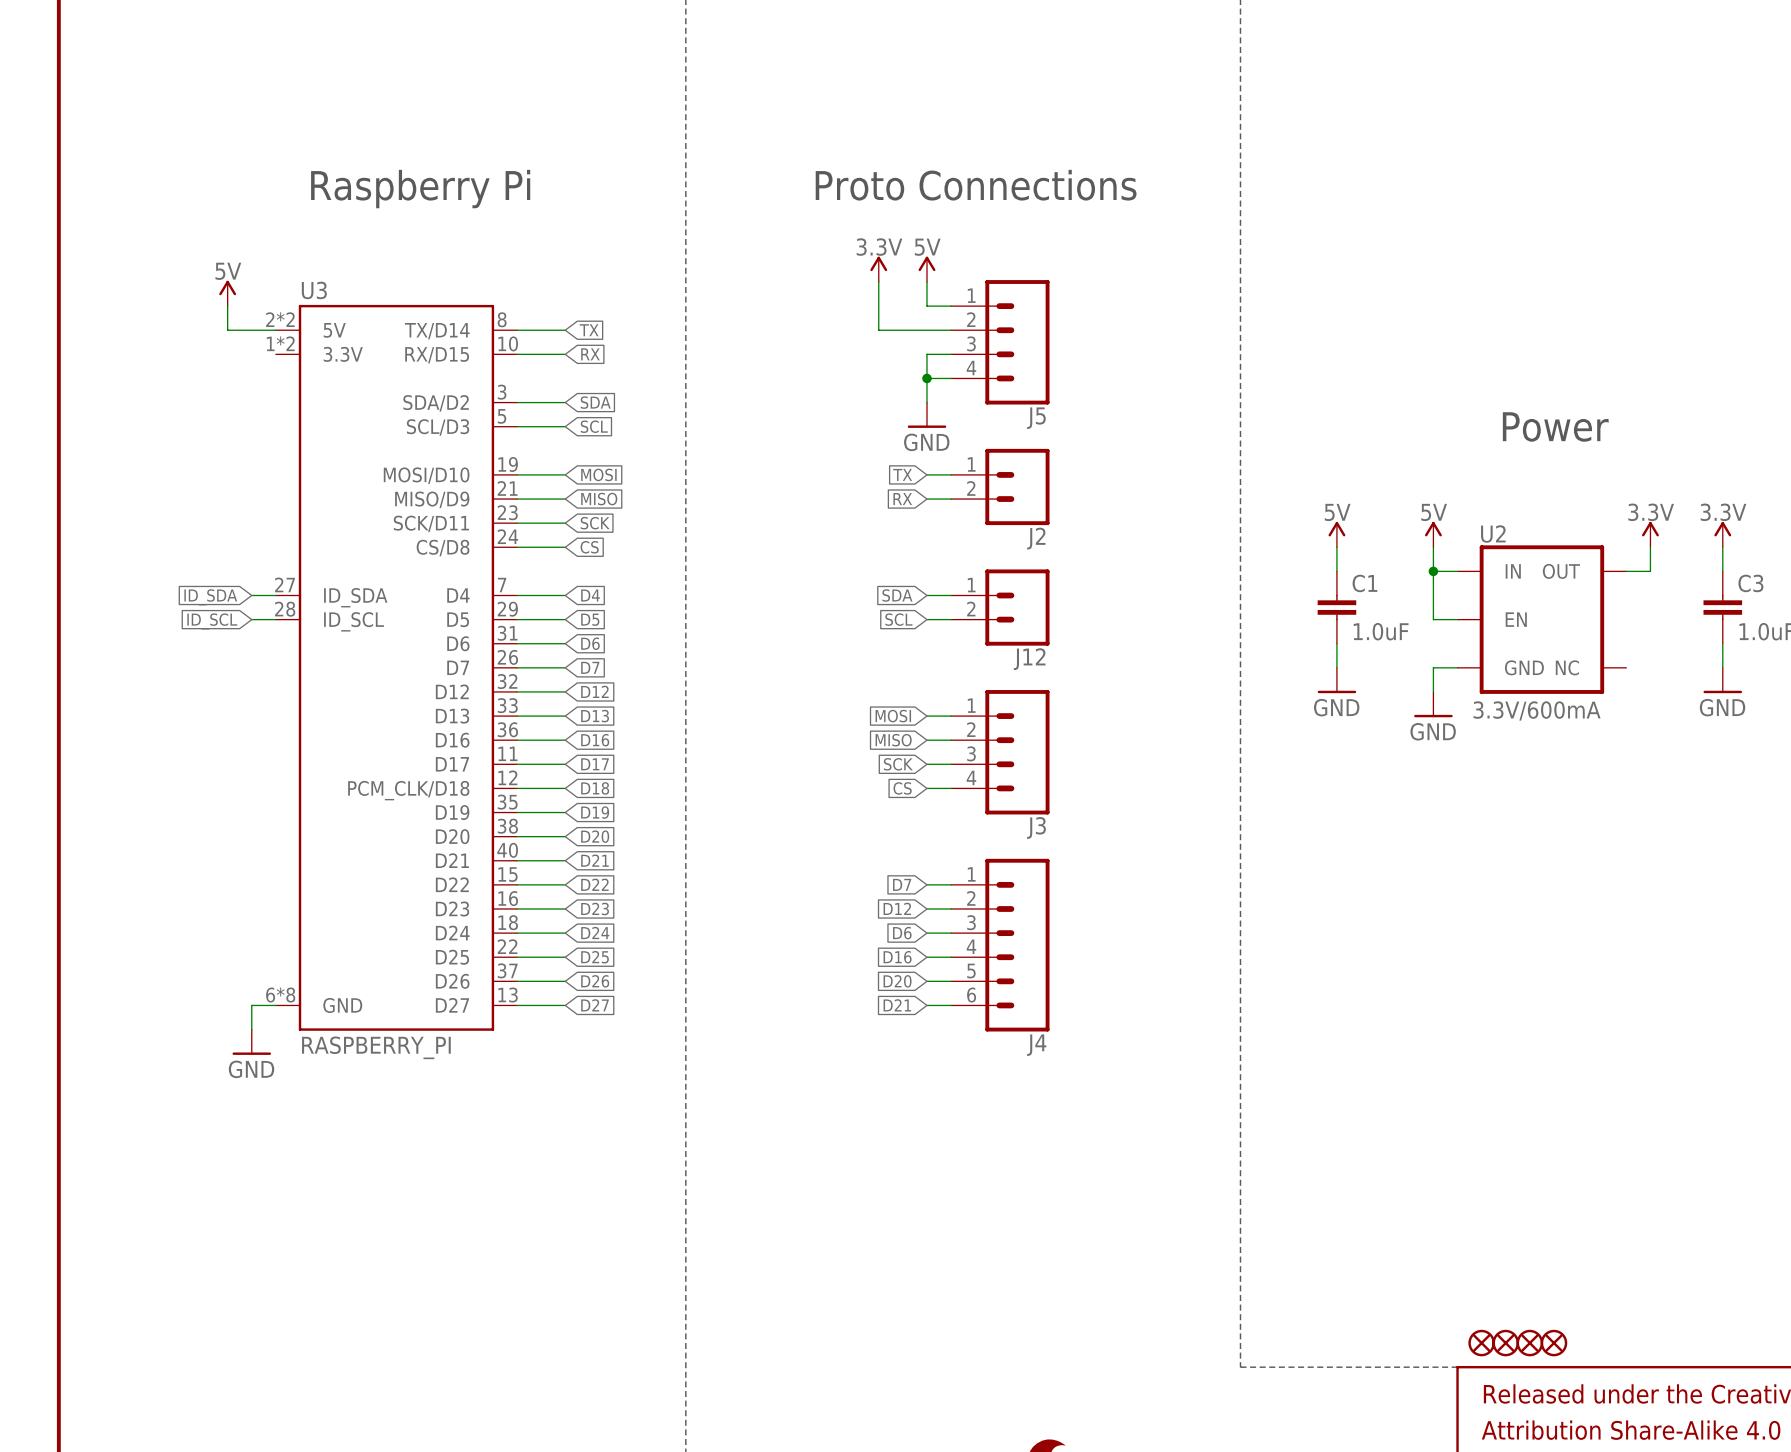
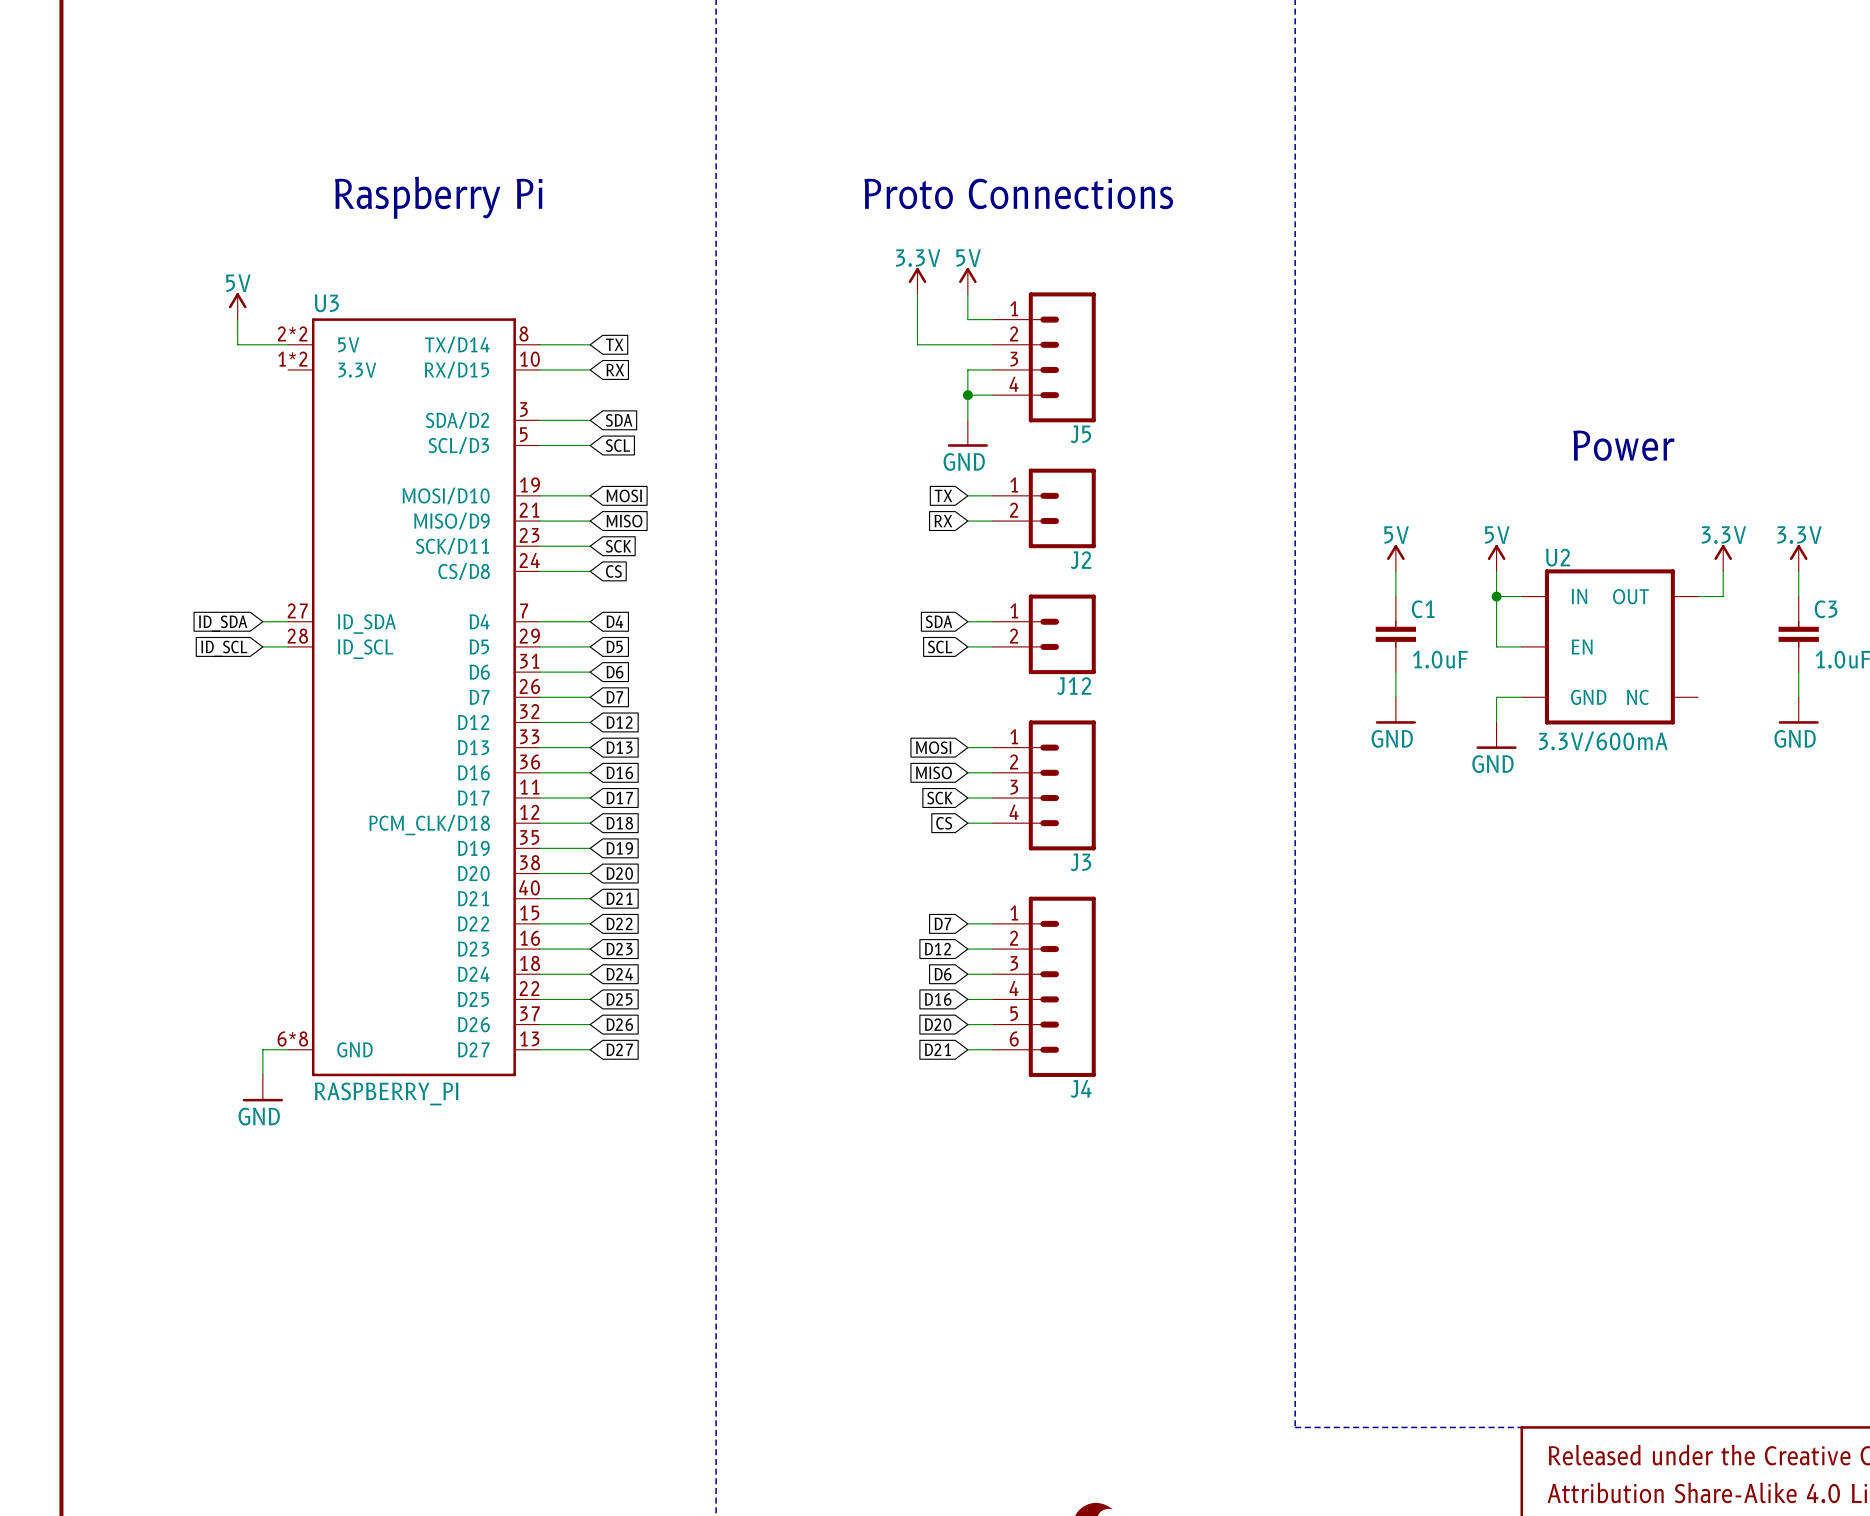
part: (1481, 1343) -> none
part: (1505, 1343) -> none
part: (1529, 1343) -> none
part: (1553, 1343) -> none

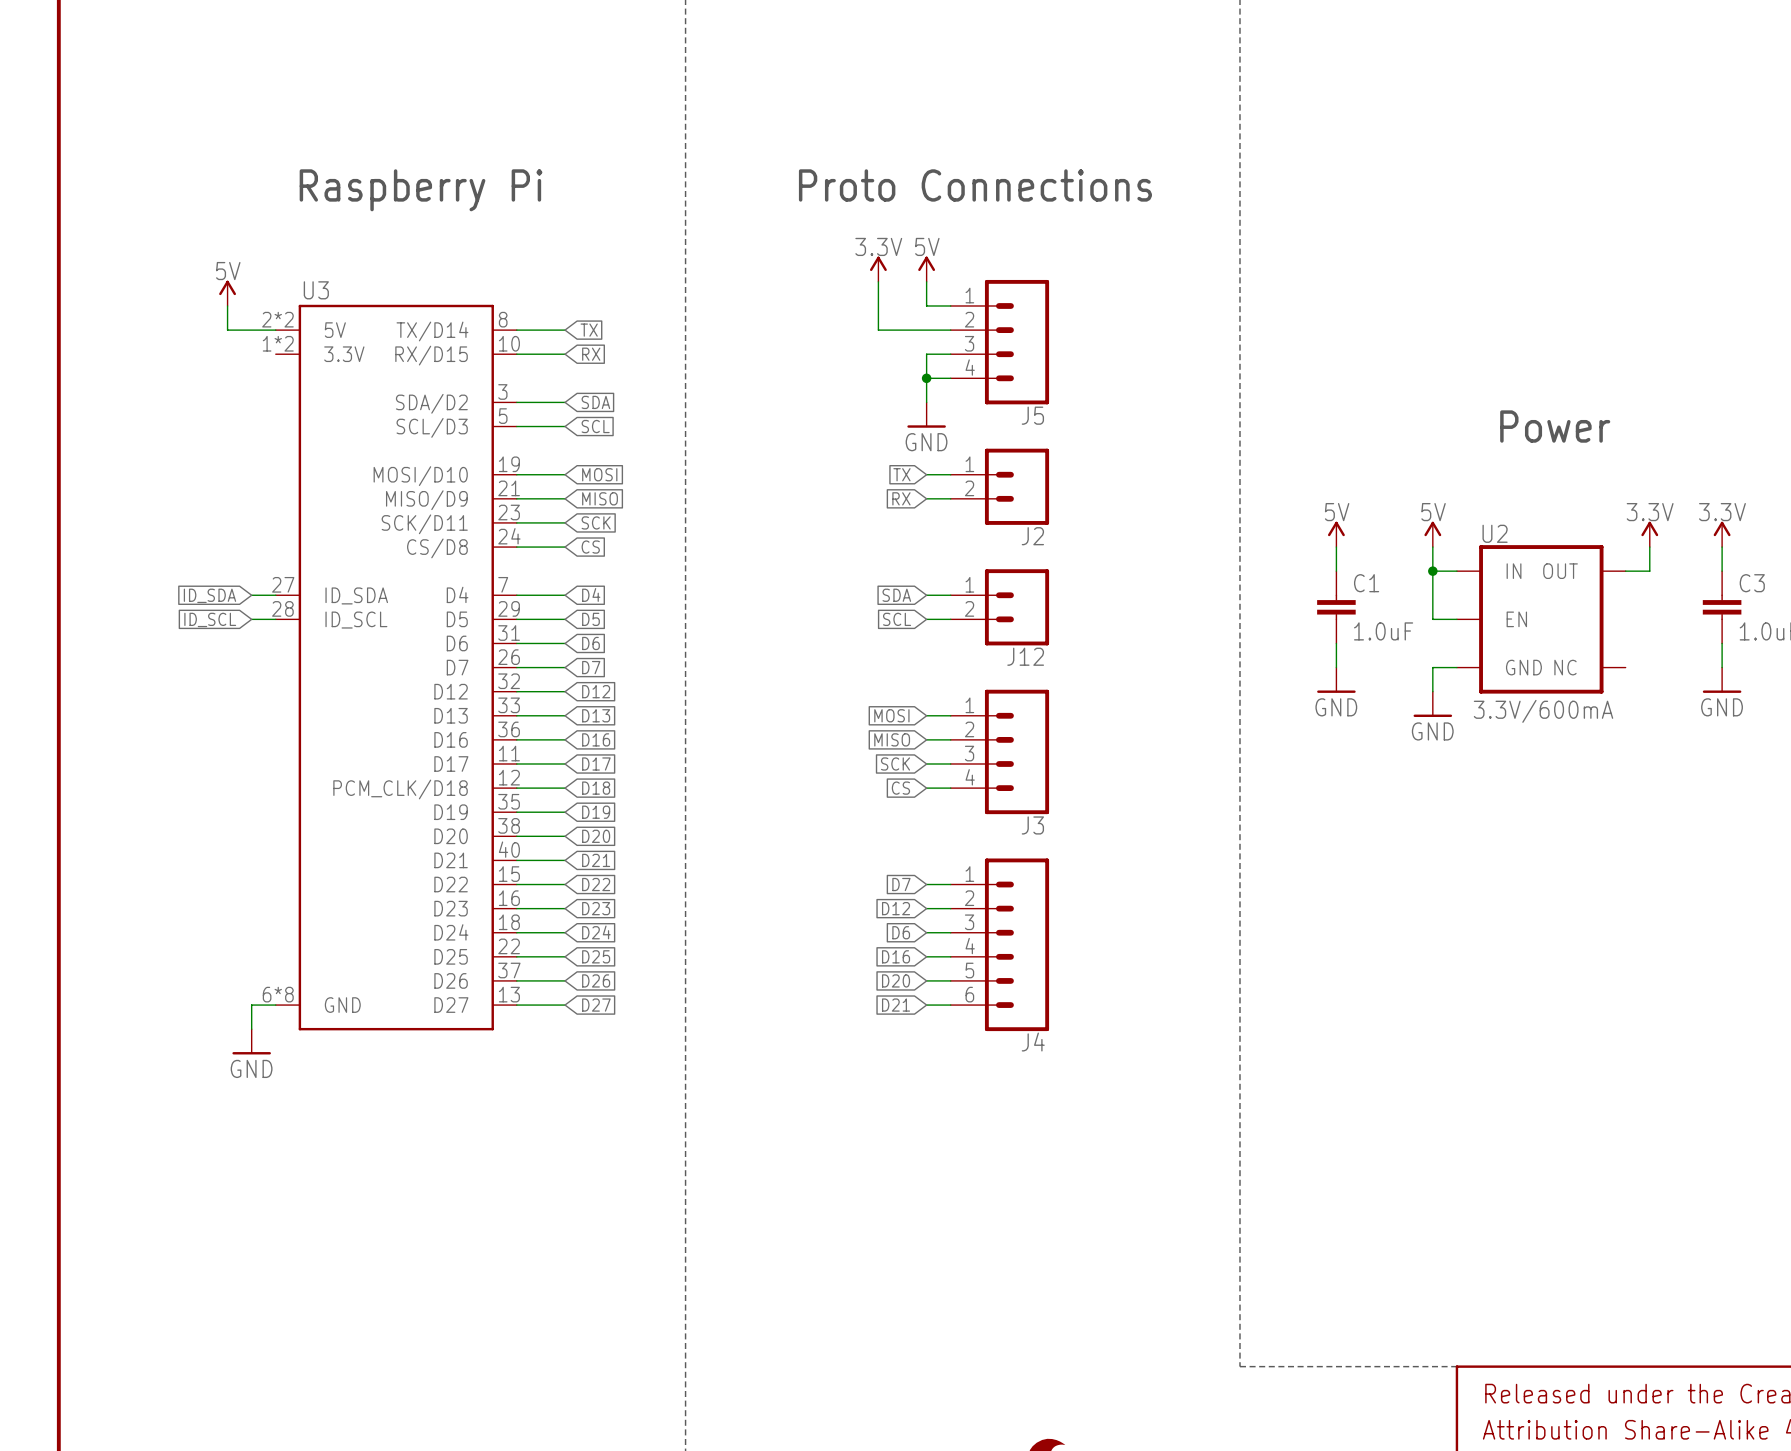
U3 value: RASPBERRY_PI (386, 1093) -> none

